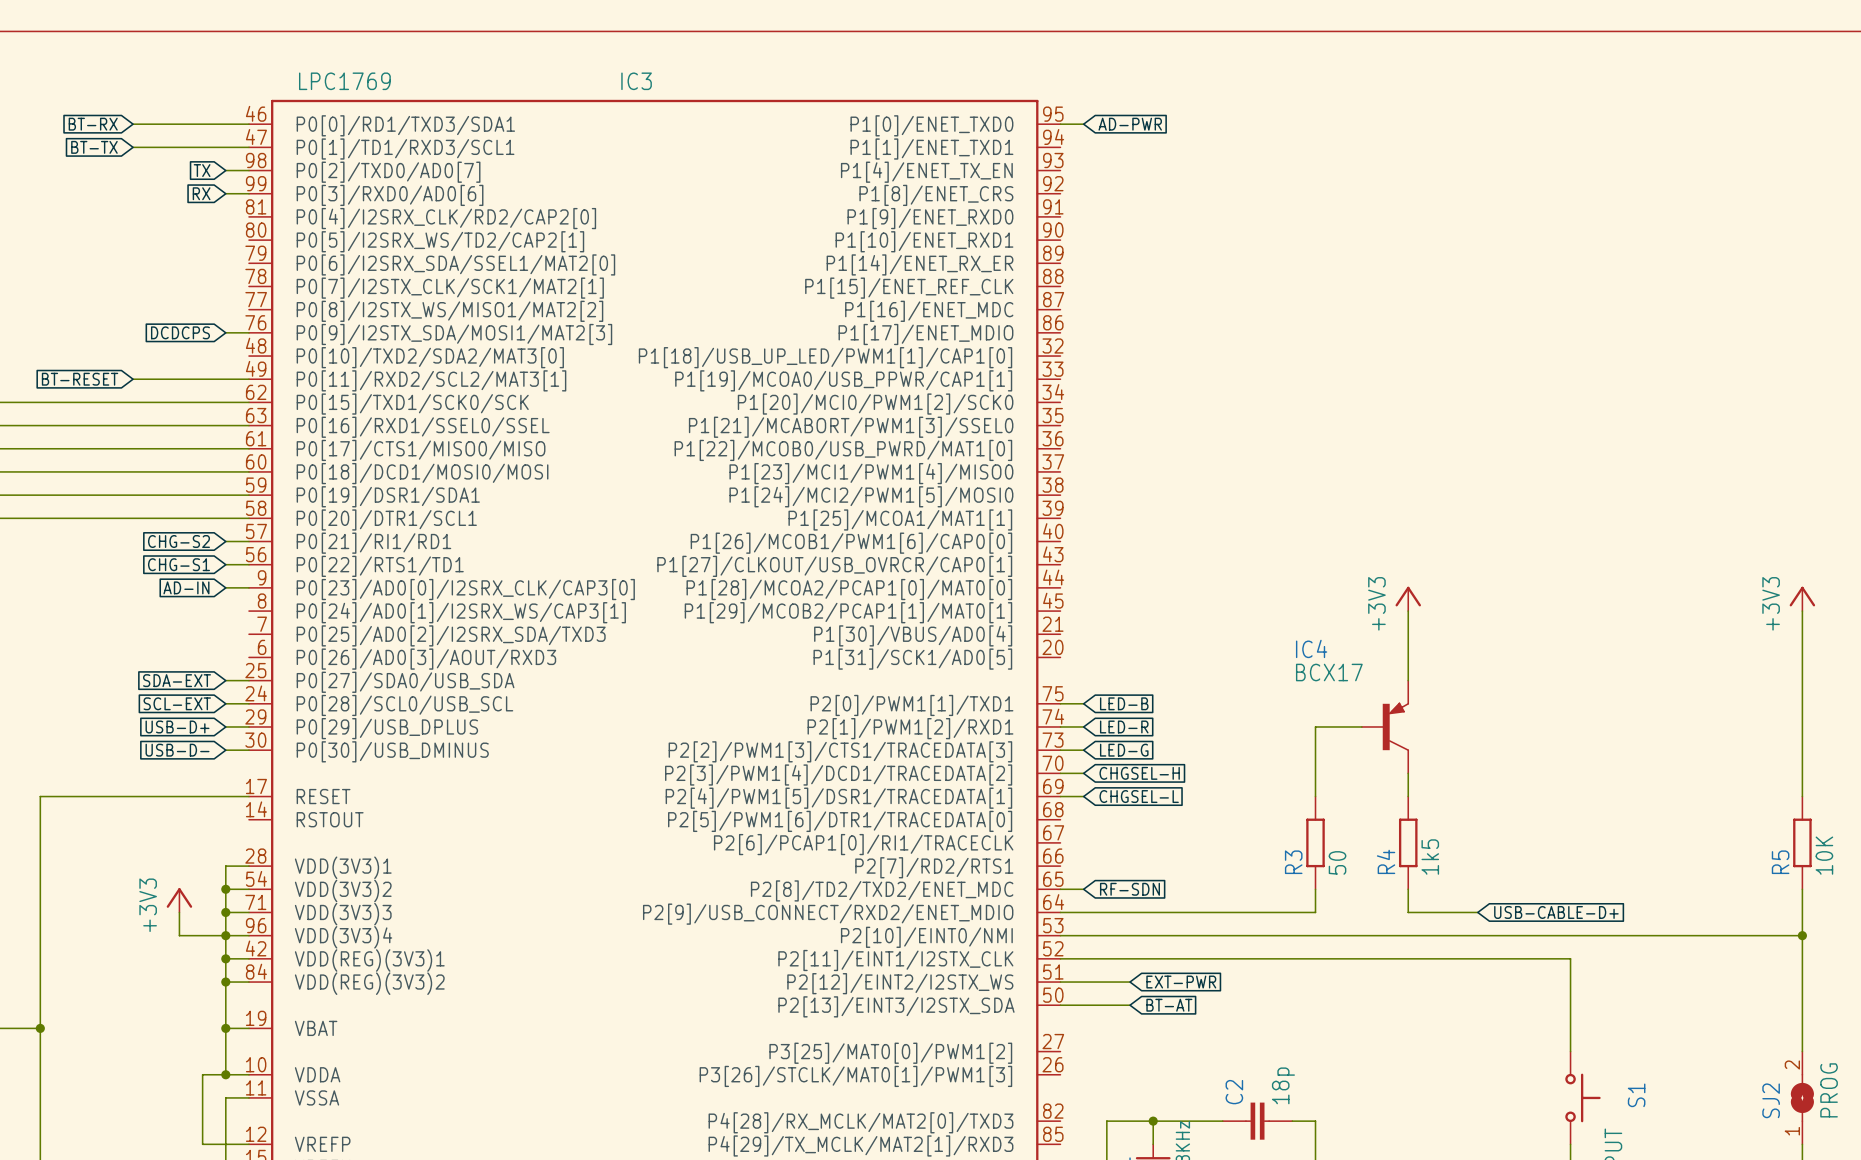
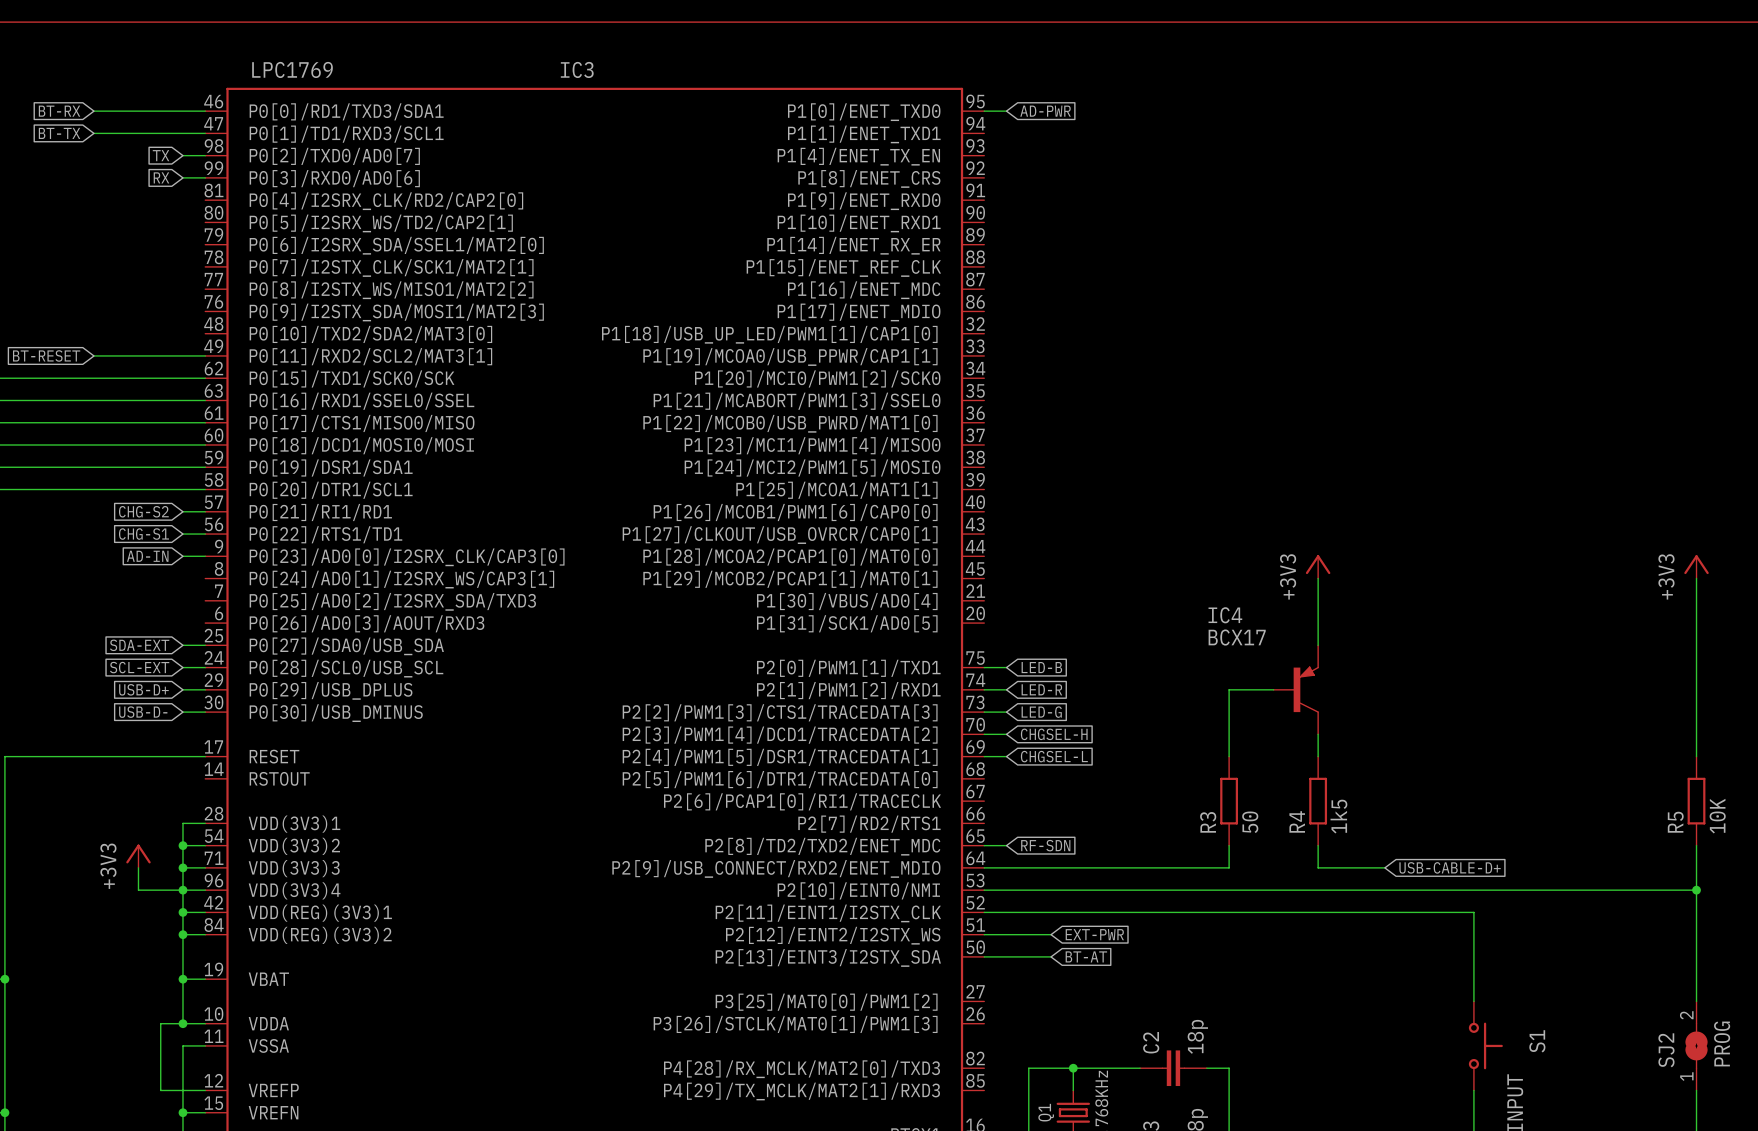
global label: DCDCPS (180, 332) -> none
wire: (225, 332) (248, 332) -> none

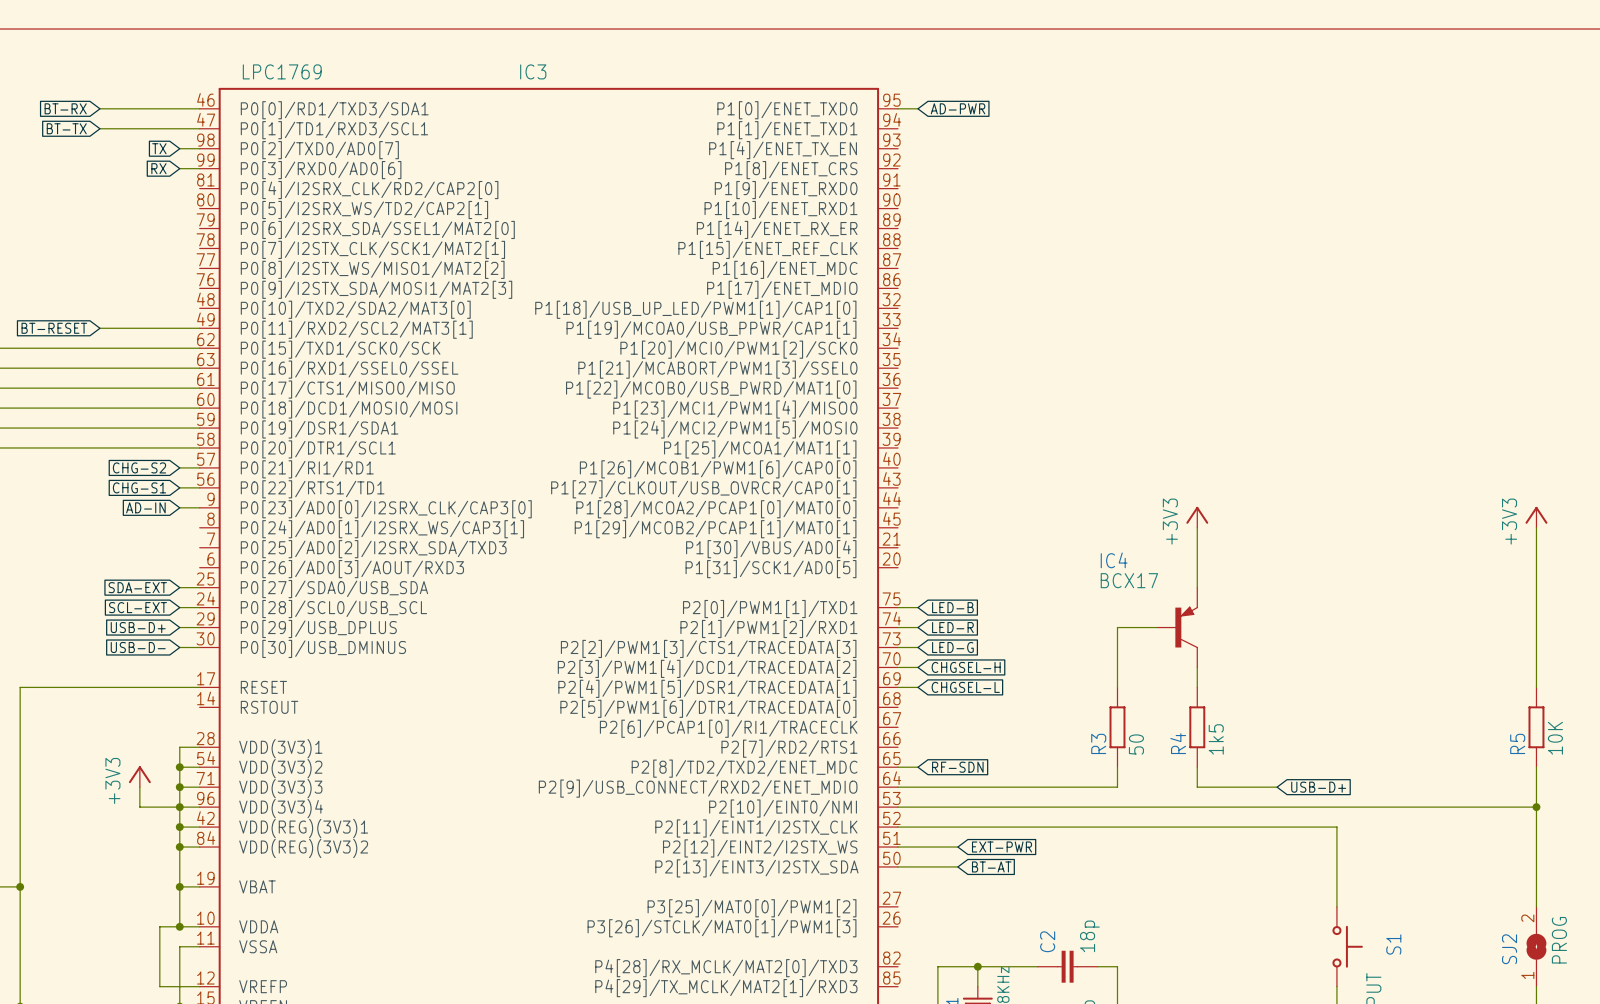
wire: none -> (1257, 787) (1277, 787)
global label: USB-CABLE-D+ (1450, 867) -> USB-D+ (1318, 787)

